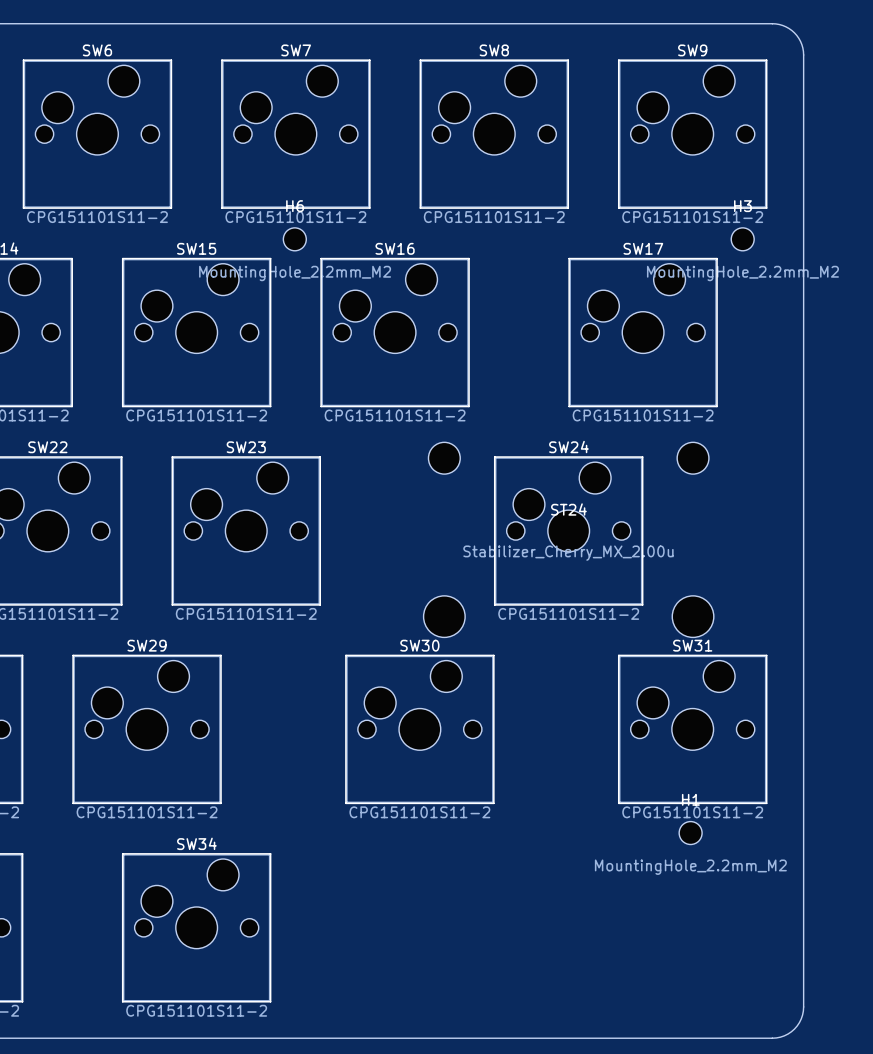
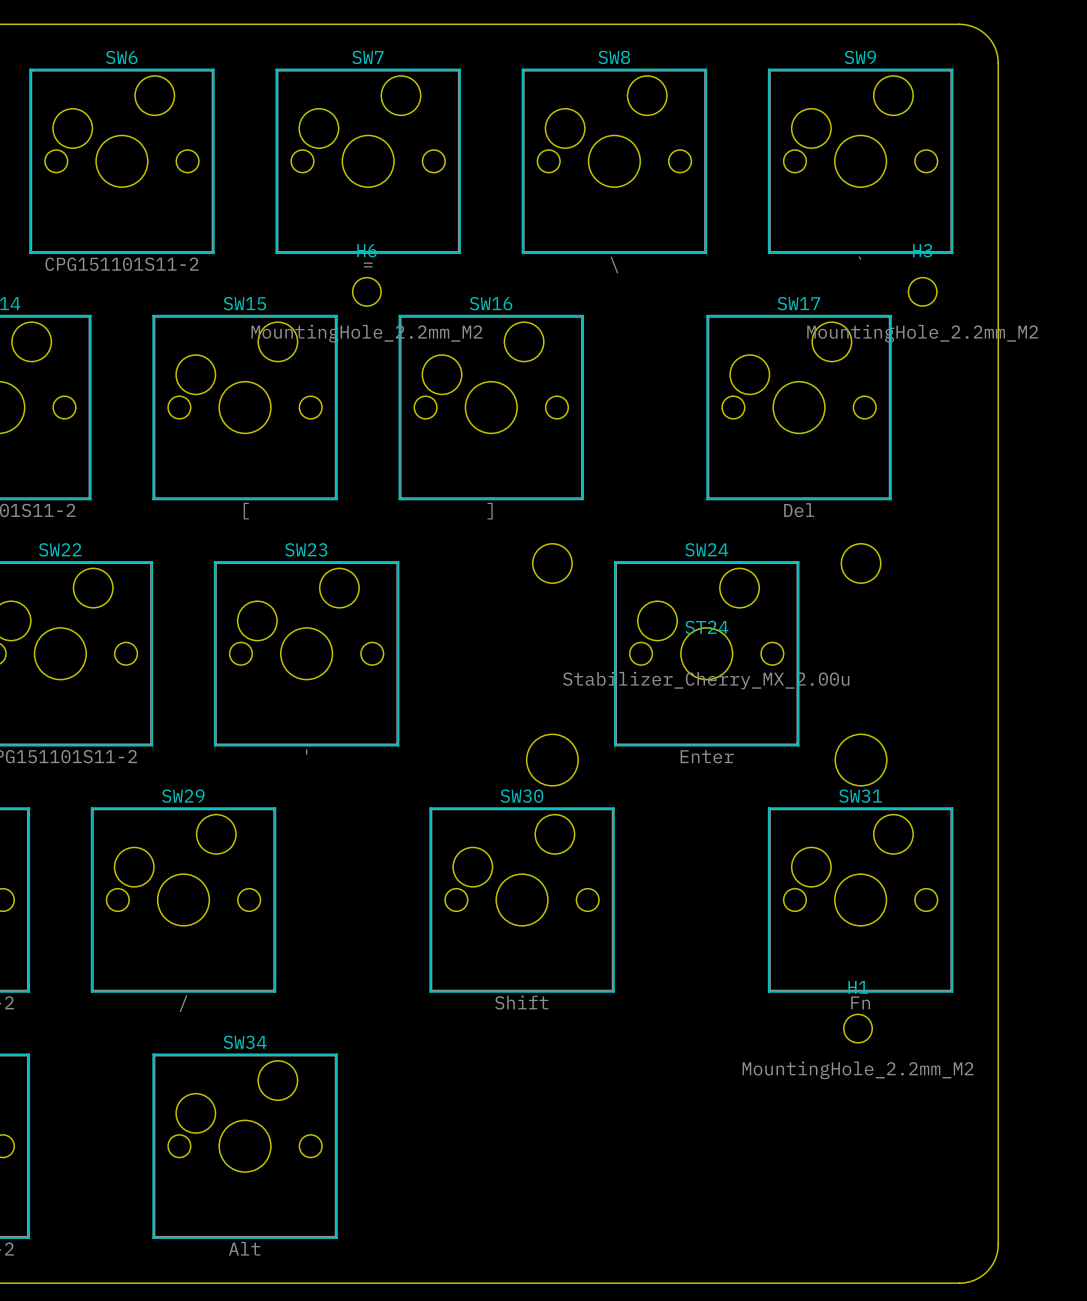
SW7 value: CPG151101S11-2 (295, 217) -> = (368, 265)
SW8 value: CPG151101S11-2 (494, 217) -> \ (614, 264)
SW9 value: CPG151101S11-2 (692, 217) -> ` (859, 258)
SW15 value: CPG151101S11-2 (196, 415) -> [ (246, 511)
SW16 value: CPG151101S11-2 (395, 415) -> ] (490, 511)
SW17 value: CPG151101S11-2 (643, 415) -> Del (799, 510)
SW23 value: CPG151101S11-2 (246, 613) -> ' (306, 752)
SW24 value: CPG151101S11-2 (568, 613) -> Enter (707, 756)
SW29 value: CPG151101S11-2 (147, 812) -> / (183, 1003)
SW30 value: CPG151101S11-2 (419, 812) -> Shift (521, 1002)
SW31 value: CPG151101S11-2 (692, 812) -> Fn (860, 1002)
SW34 value: CPG151101S11-2 (196, 1010) -> Alt (244, 1248)

